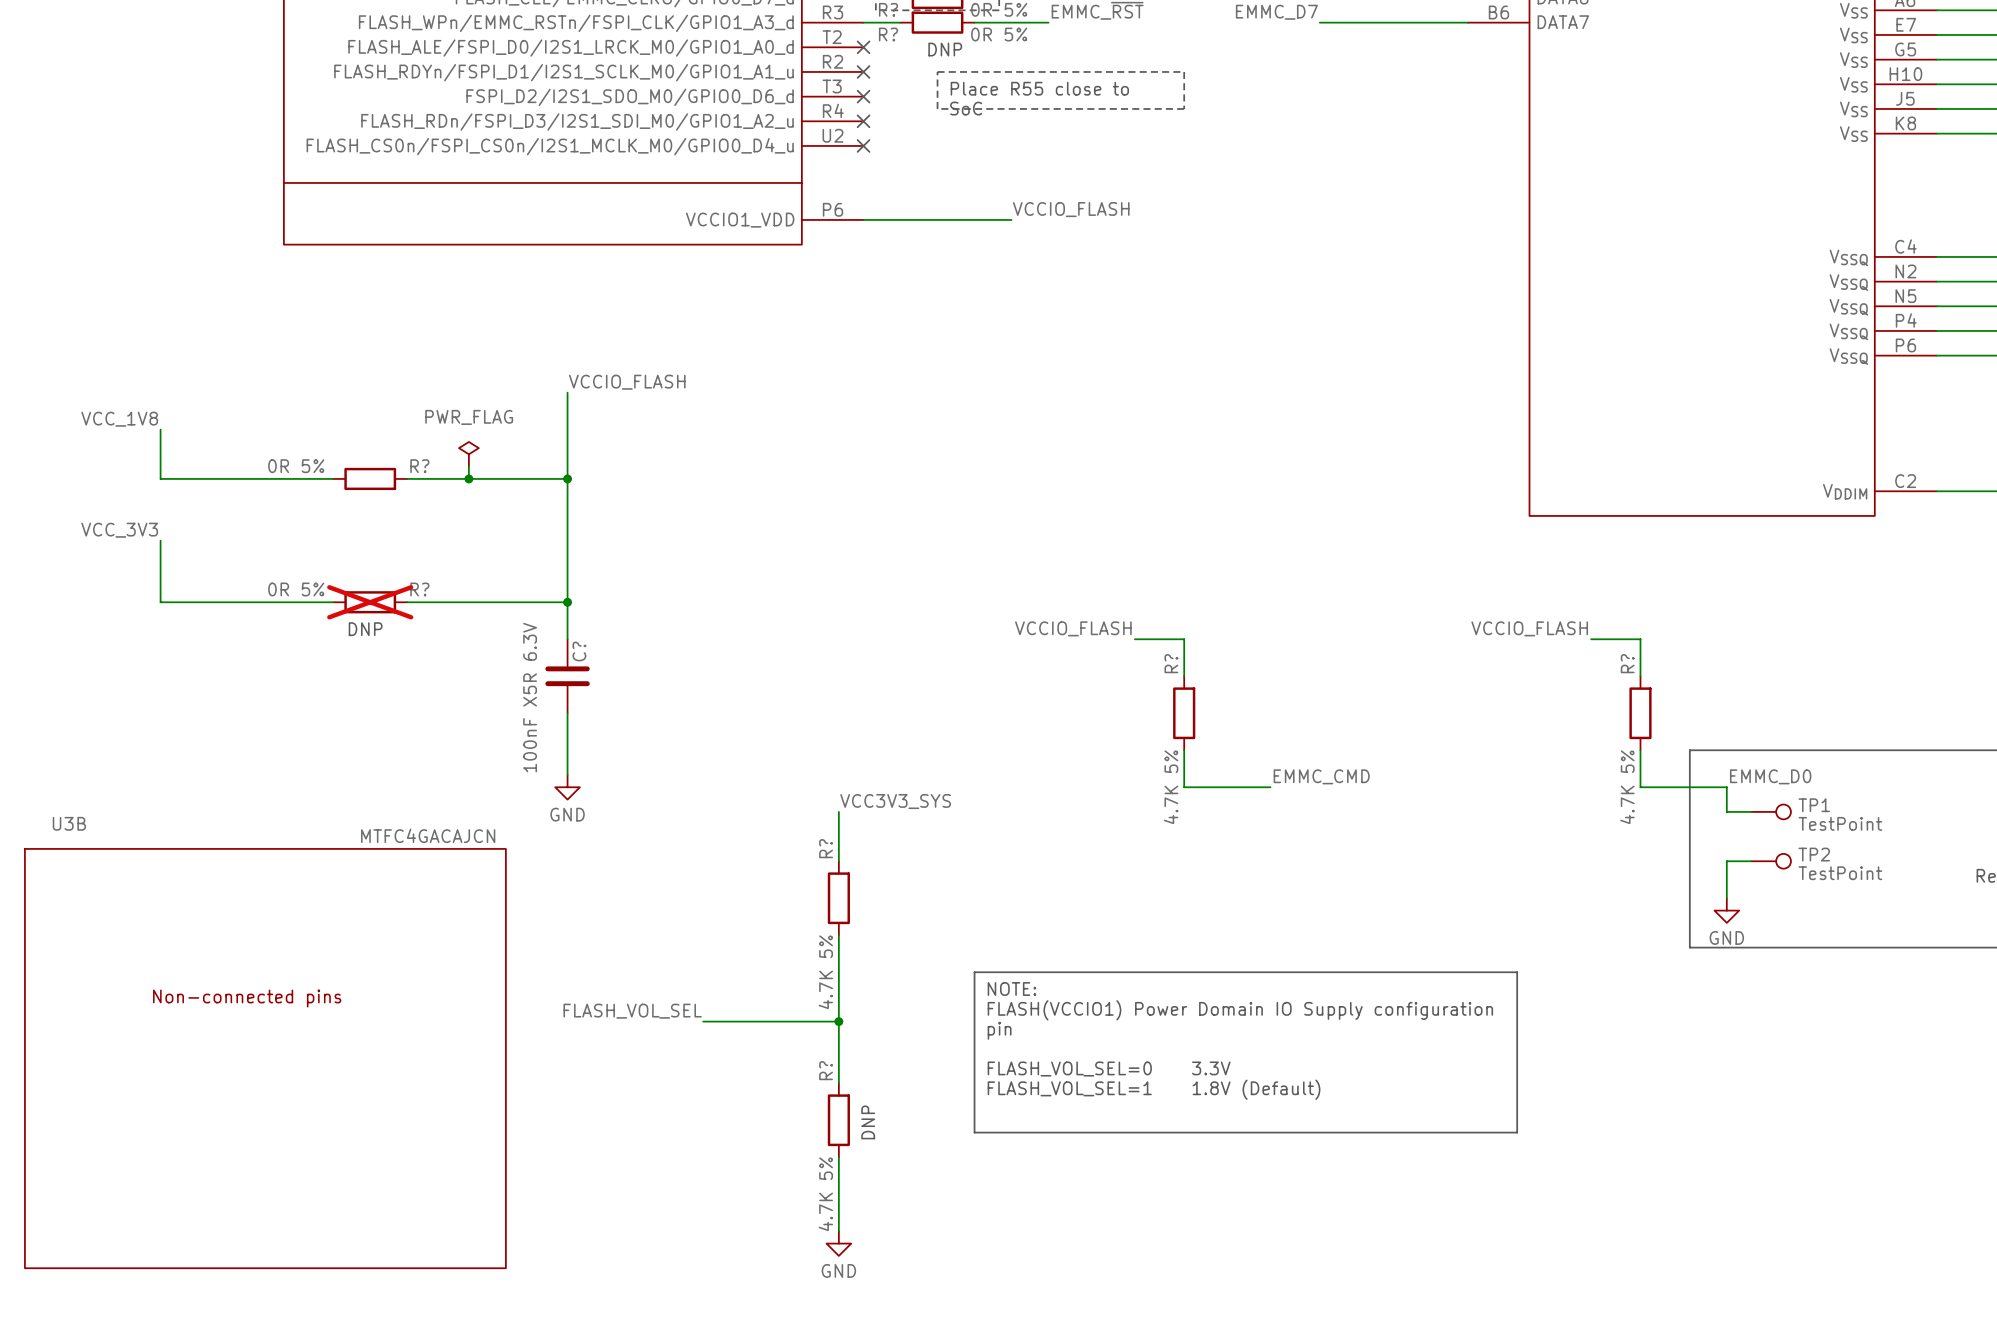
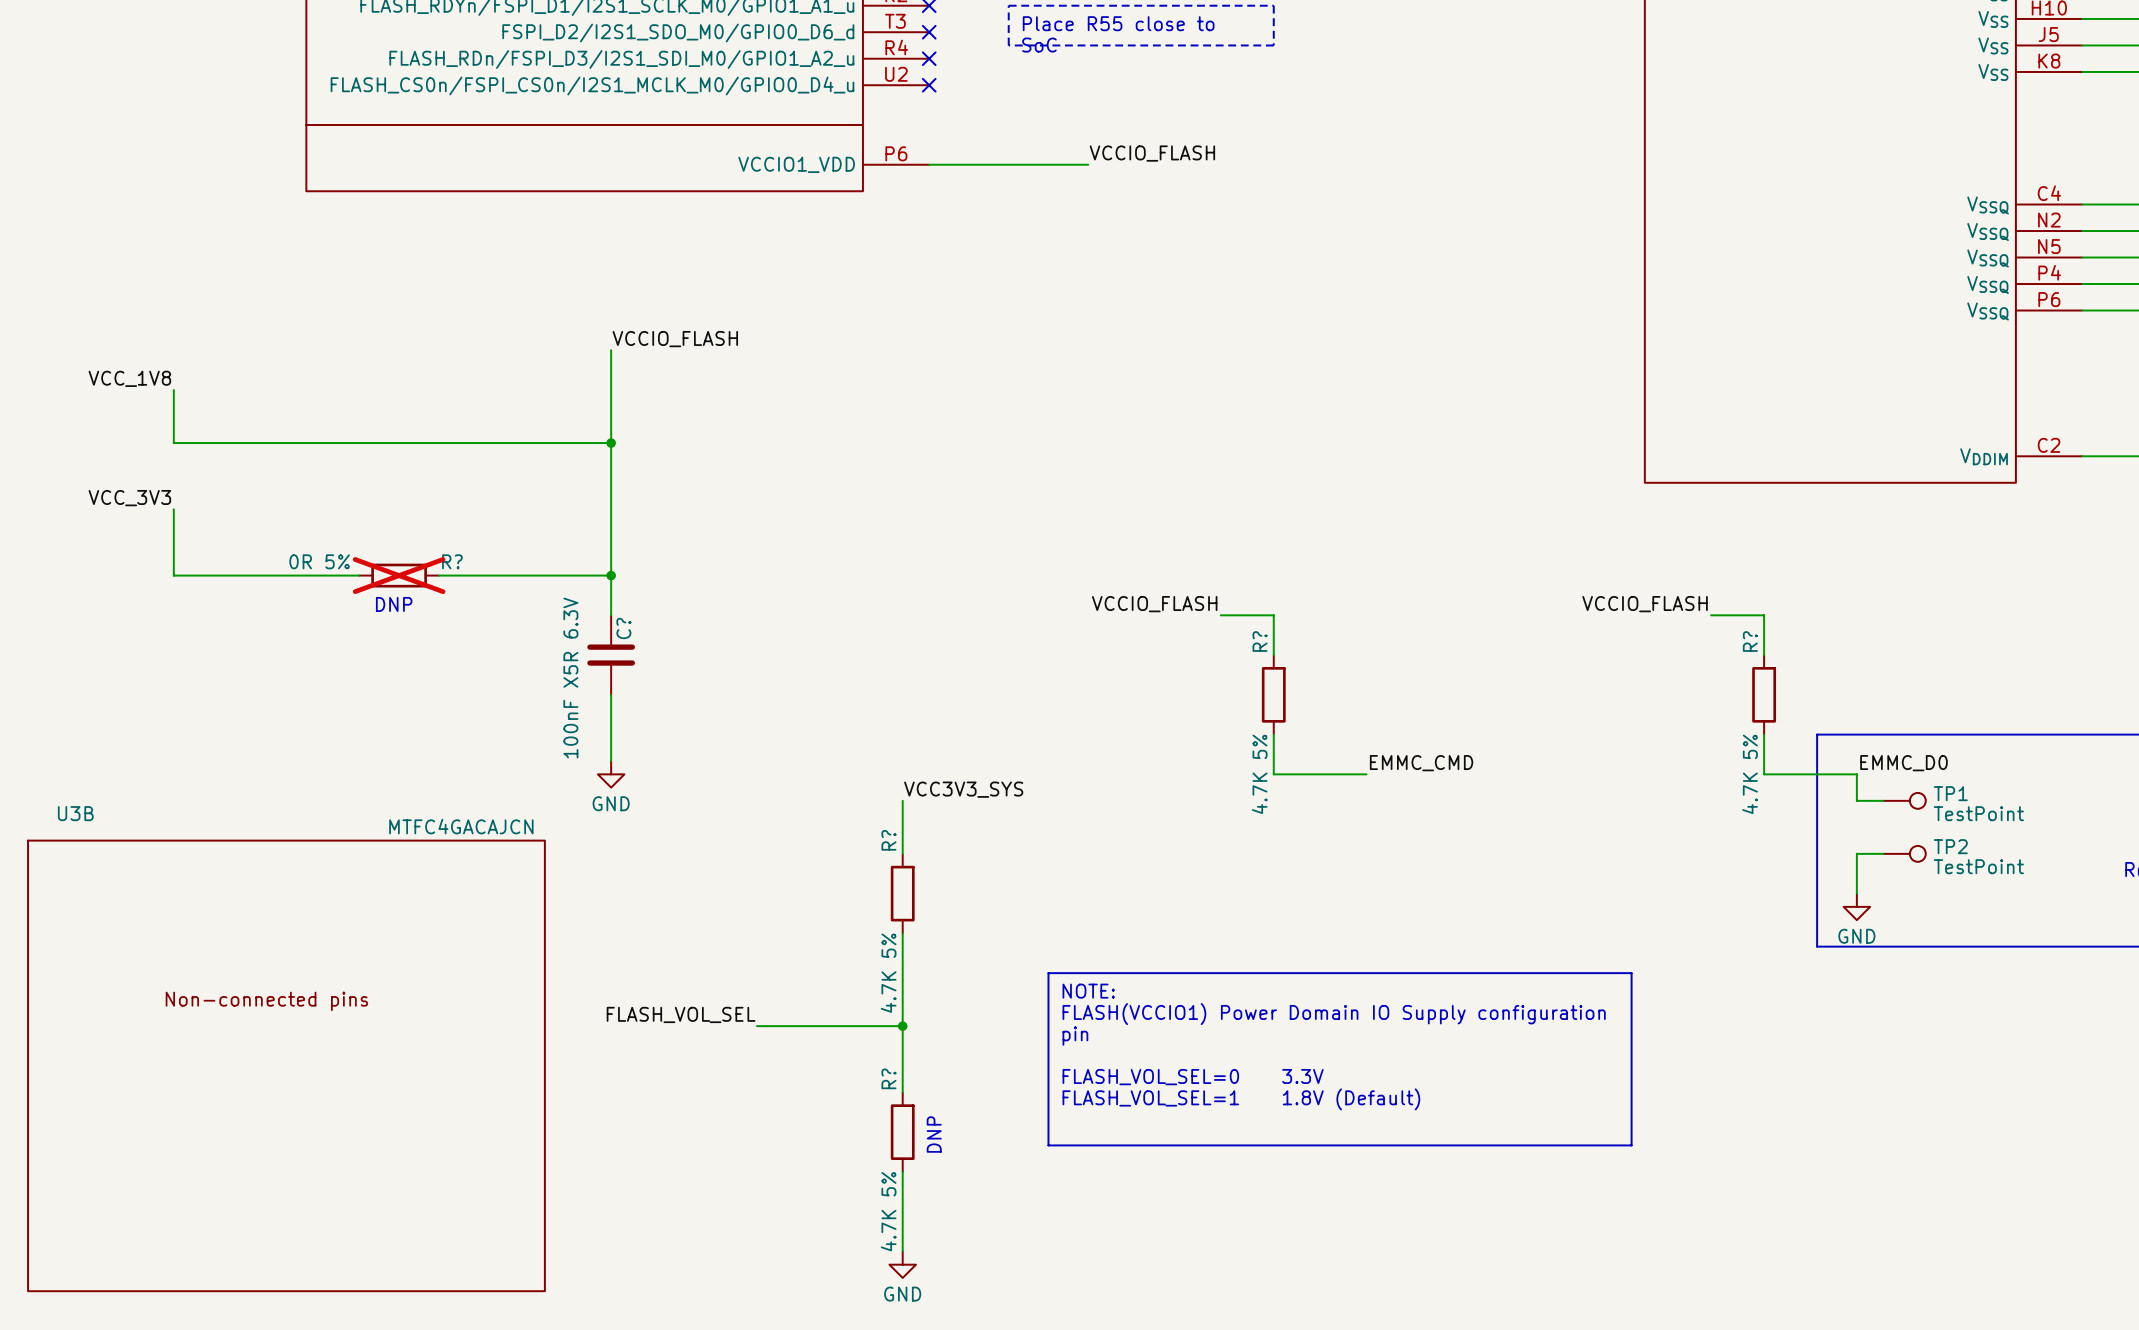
power symbol: PWR_FLAG (468, 454) -> none
wire: (468, 466) (468, 478) -> none
wire: none -> (359, 443) (438, 443)
R?: 0R 5% (370, 478) -> none
junction: (468, 478) -> none

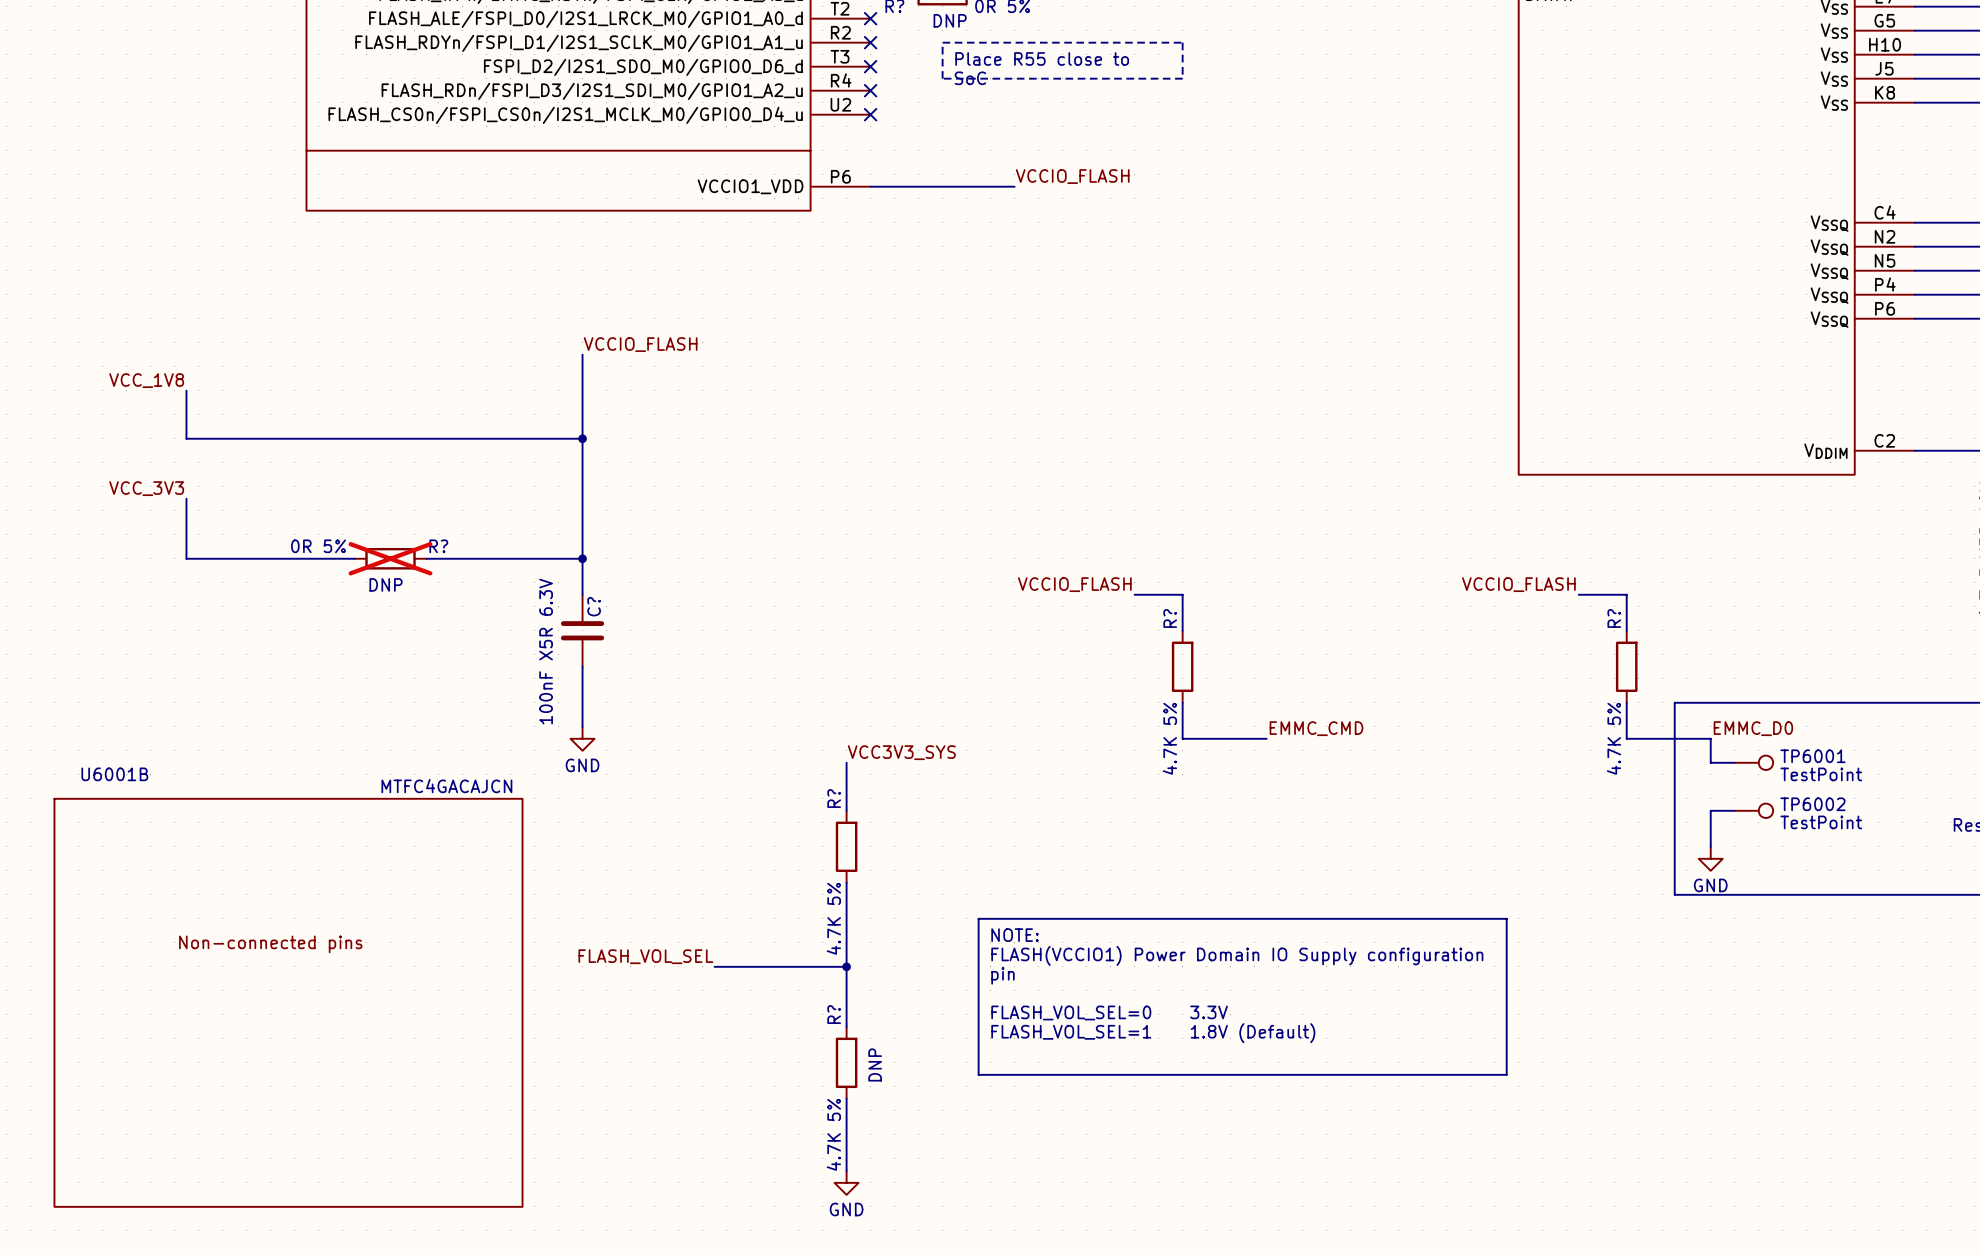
TP1 name: TP1 (1950, 793) -> TP6001 (1812, 756)
U3B name: U3B (75, 813) -> U6001B (114, 774)
TP2 name: TP2 (1950, 846) -> TP6002 (1812, 804)

